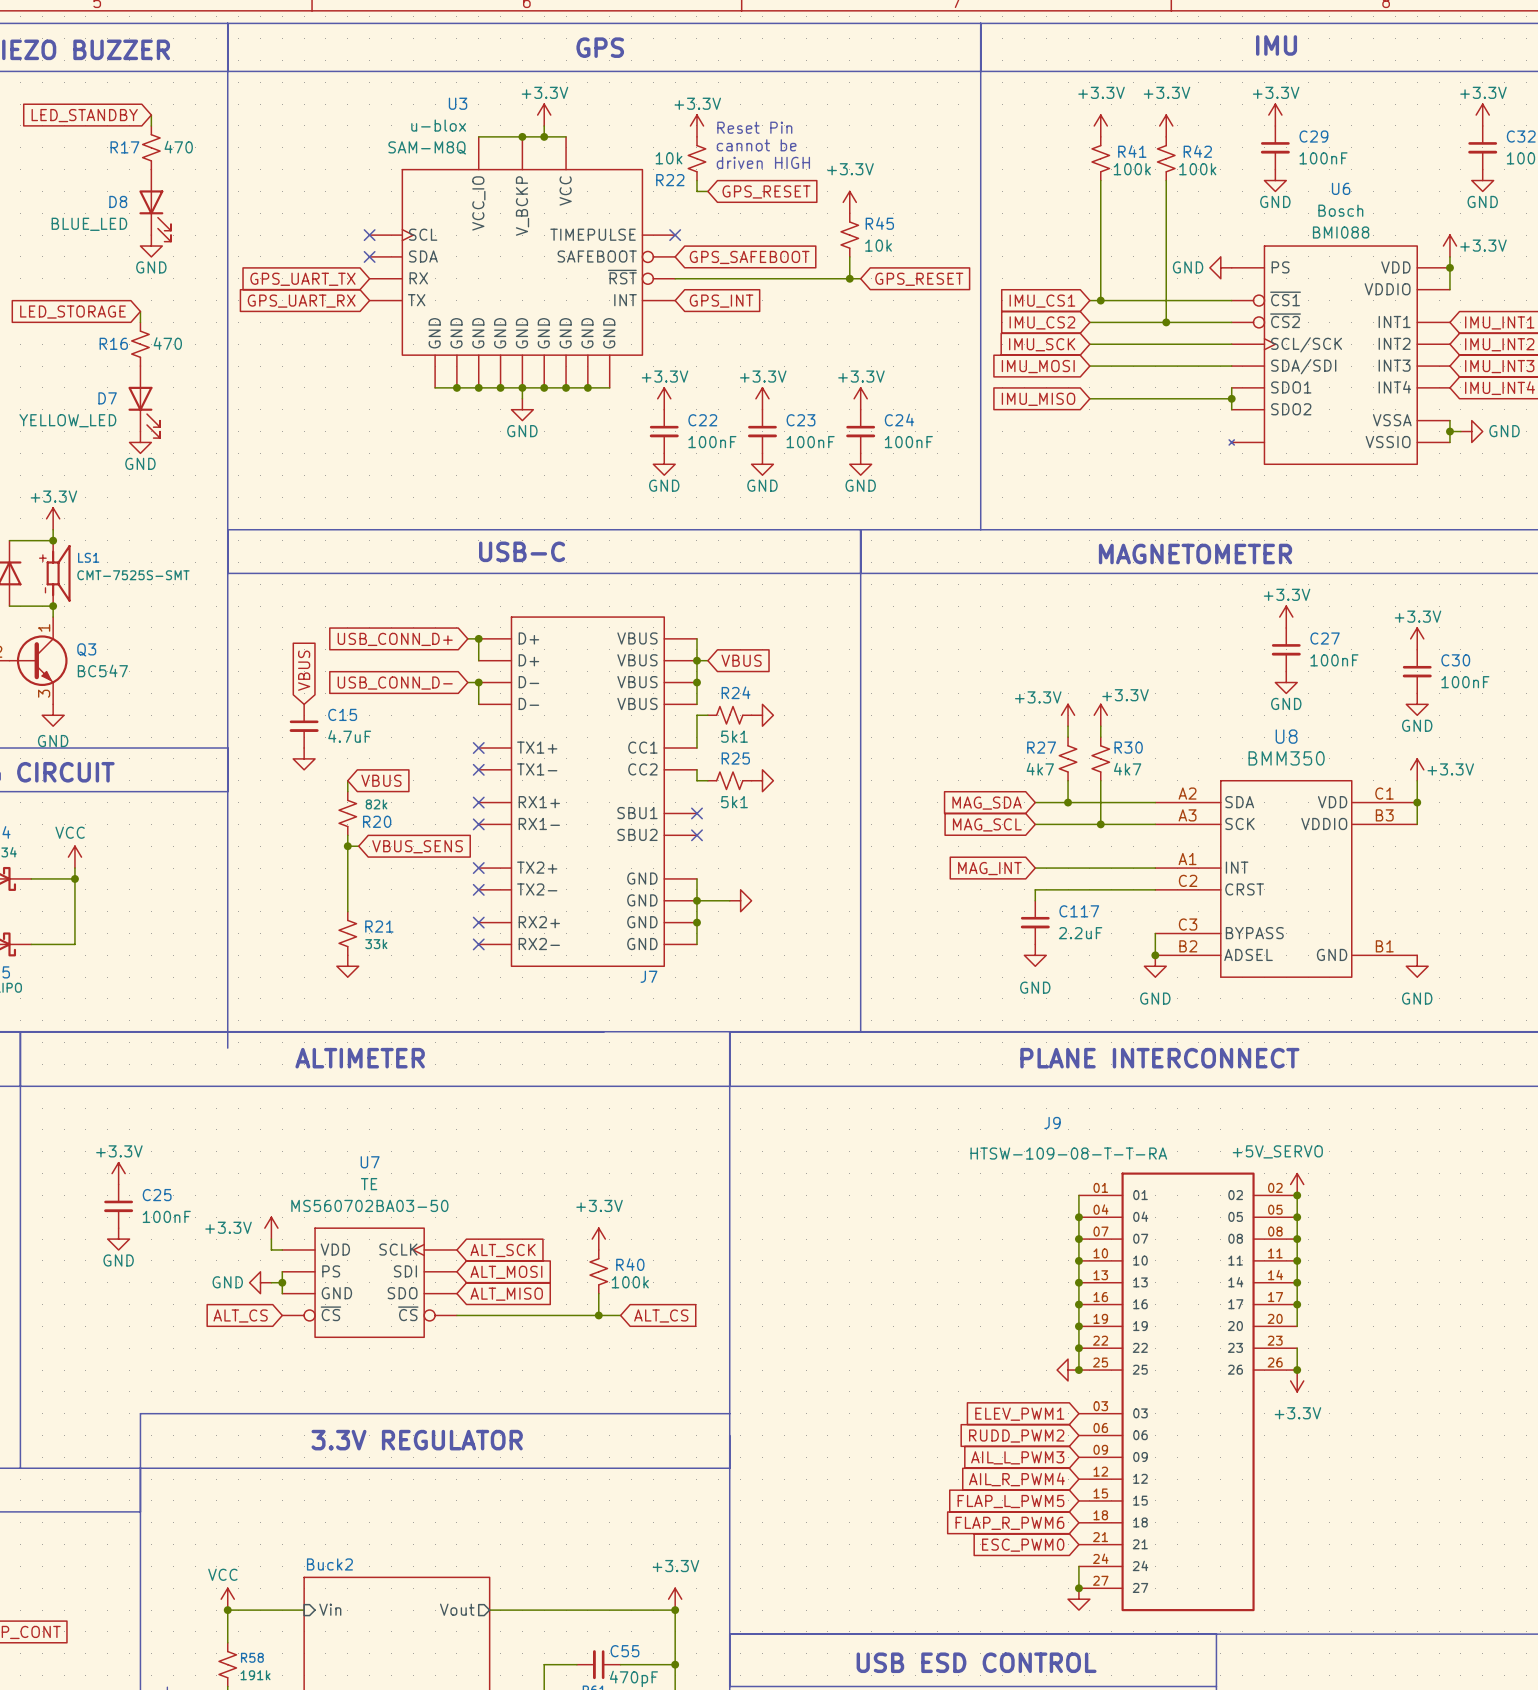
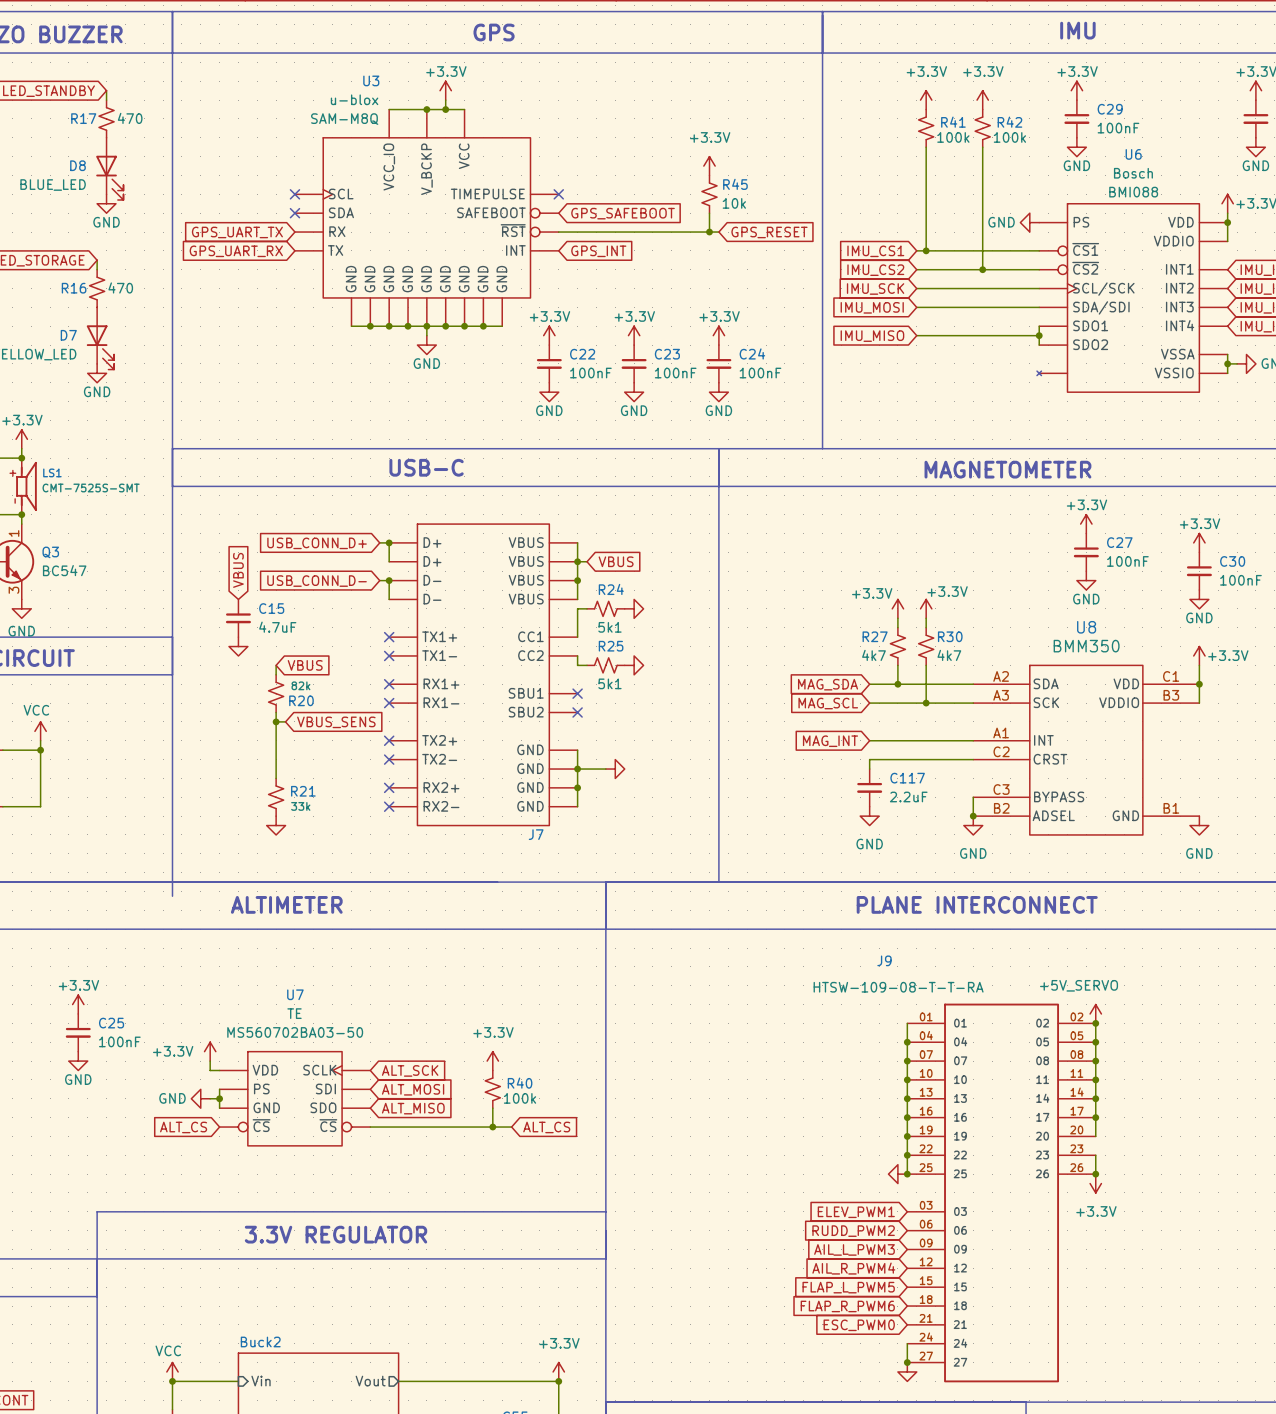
power symbol: +3.3V (696, 125) -> none
text: Reset Pin (754, 127) -> none
text: cannot be (756, 145) -> none
R22: 10k (696, 158) -> none
text: driven HIGH (763, 162) -> none
wire: (696, 180) (696, 191) (707, 191) -> none
global label: GPS_RESET (766, 191) -> none

